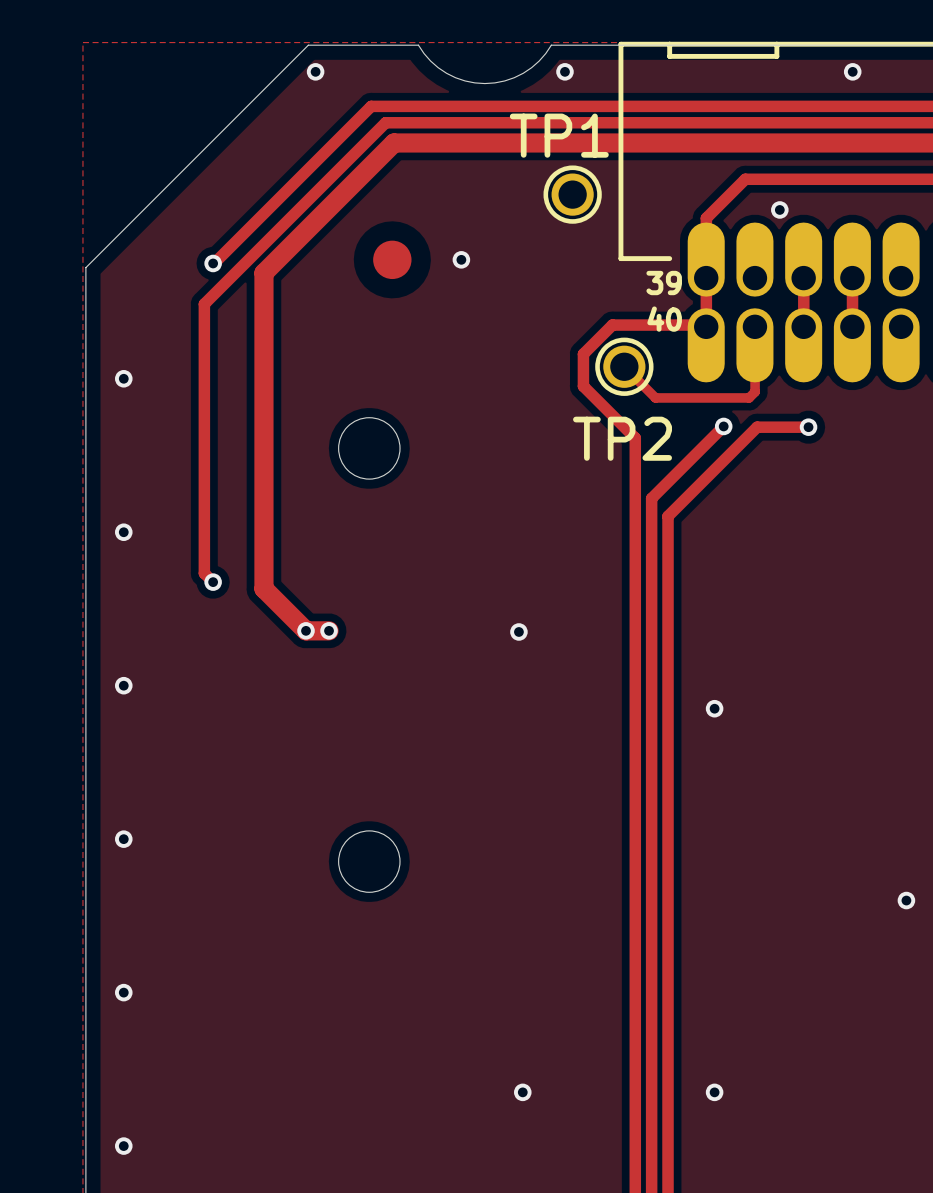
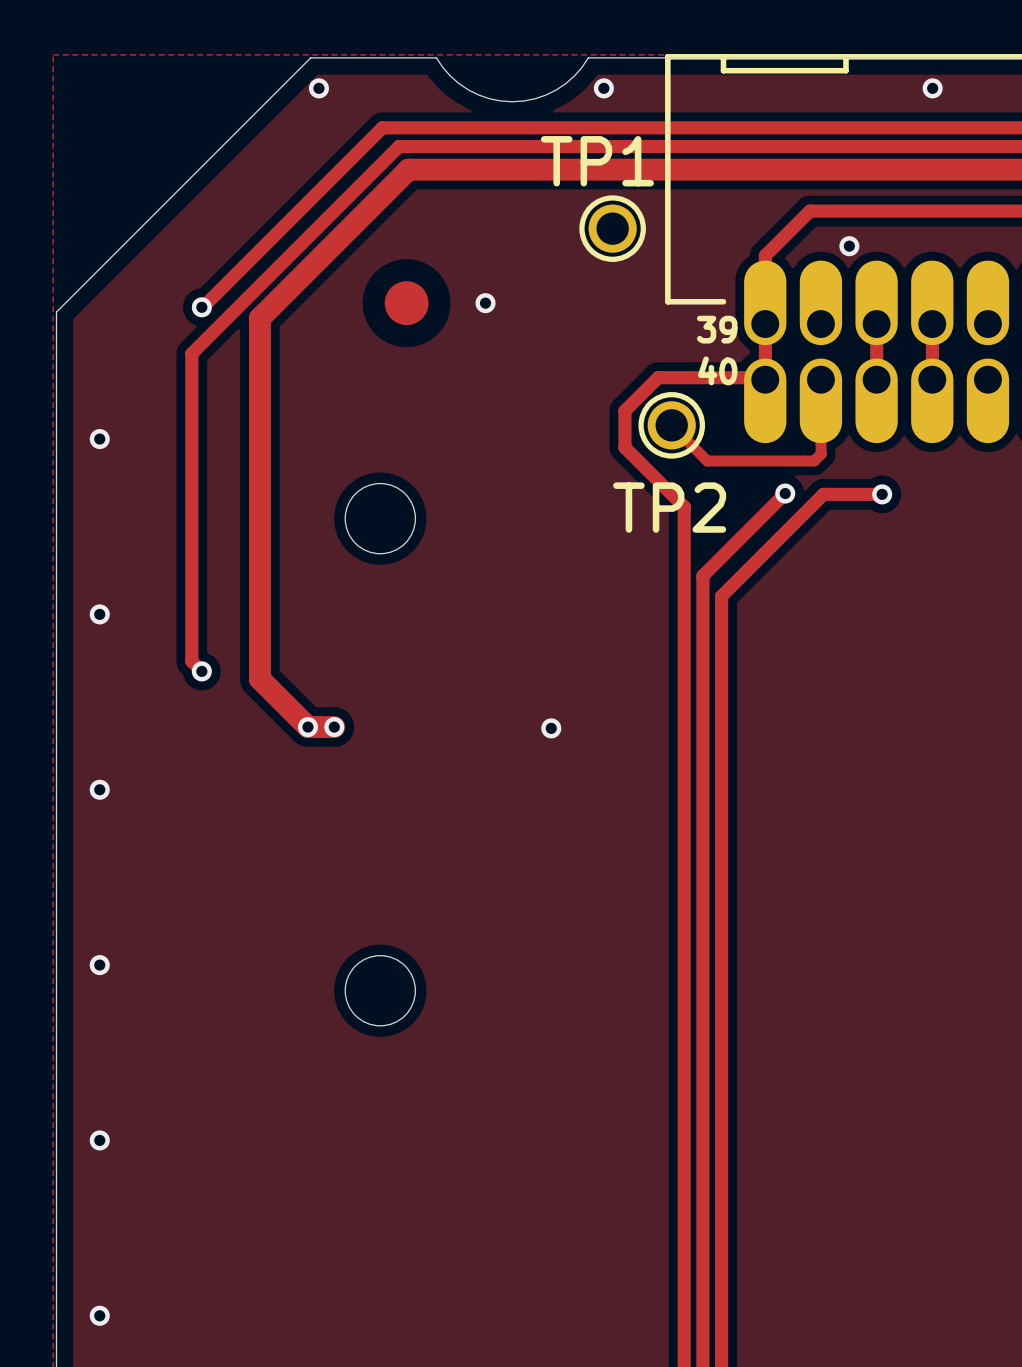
via: (714, 708) -> none
via: (906, 900) -> none
via: (522, 1092) -> none
via: (714, 1092) -> none

